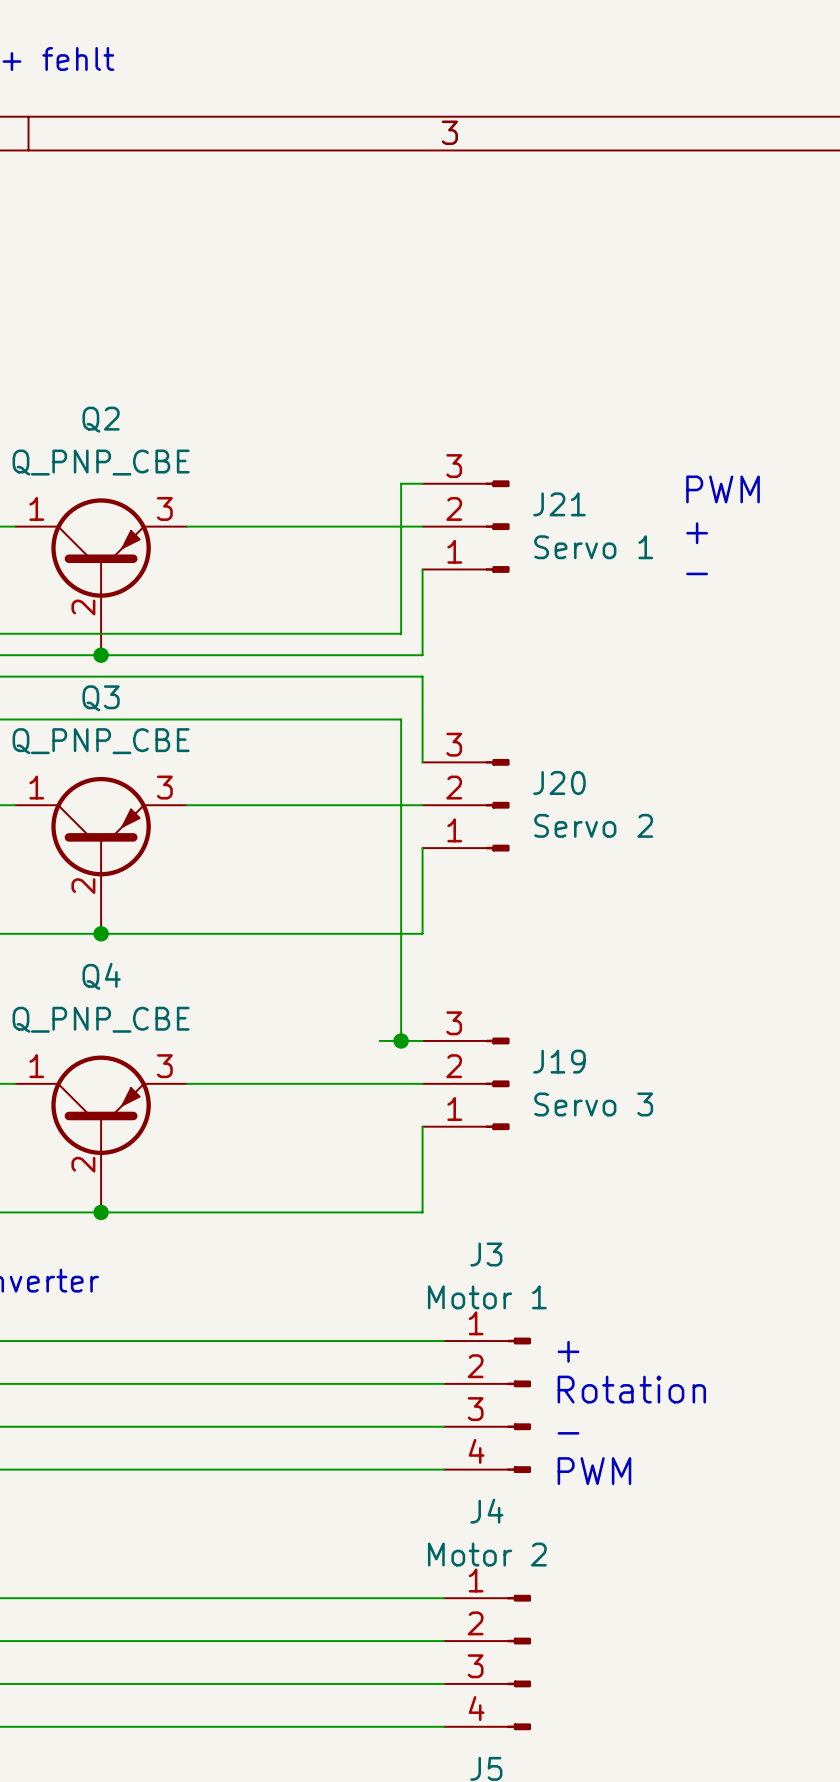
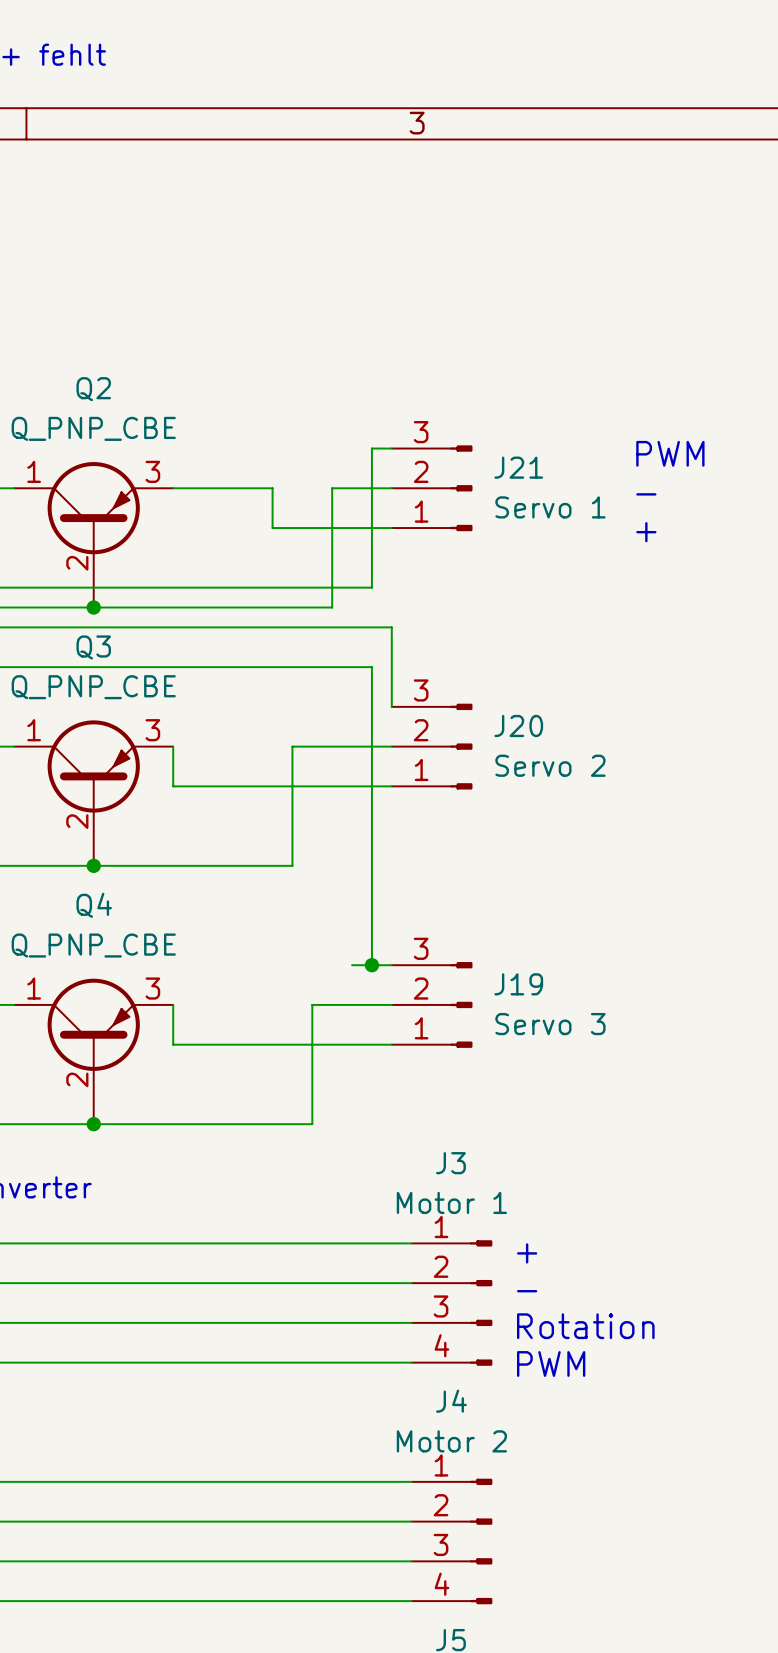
wire: (293, 526) (358, 526) -> (272, 488) (272, 528) (391, 528)
text: + (697, 533) -> - (646, 494)
wire: (422, 569) (422, 655) (358, 655) -> (332, 488) (332, 607)
text: - (697, 573) -> + (646, 532)
wire: (186, 805) (315, 805) -> (173, 746) (173, 786) (391, 786)
wire: (422, 848) (422, 933) (315, 933) -> (292, 746) (292, 865)
wire: (186, 1083) (336, 1083) -> (173, 1004) (173, 1044) (391, 1044)
wire: (422, 1126) (422, 1212) (336, 1212) -> (312, 1004) (312, 1124)
text: Rotation (631, 1389) -> - (527, 1291)
text: - (568, 1433) -> Rotation (585, 1326)

